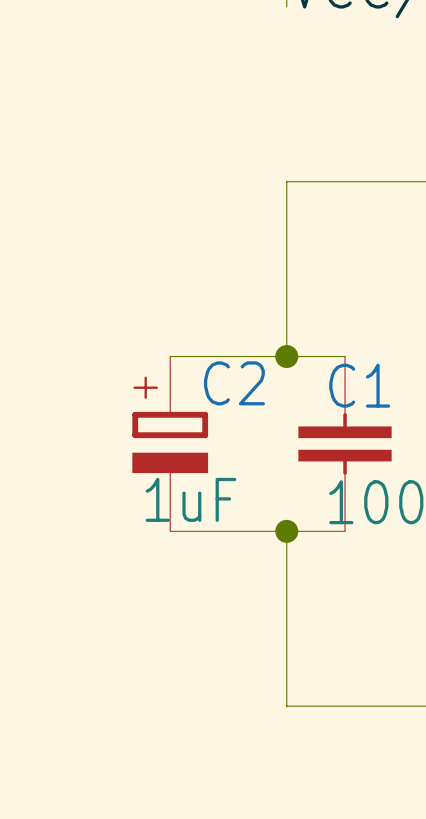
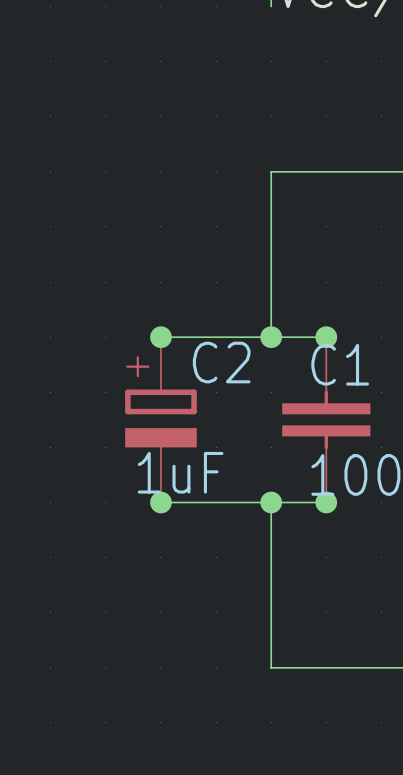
junction: none -> (160, 337)
junction: none -> (326, 337)
junction: none -> (160, 502)
junction: none -> (326, 502)

